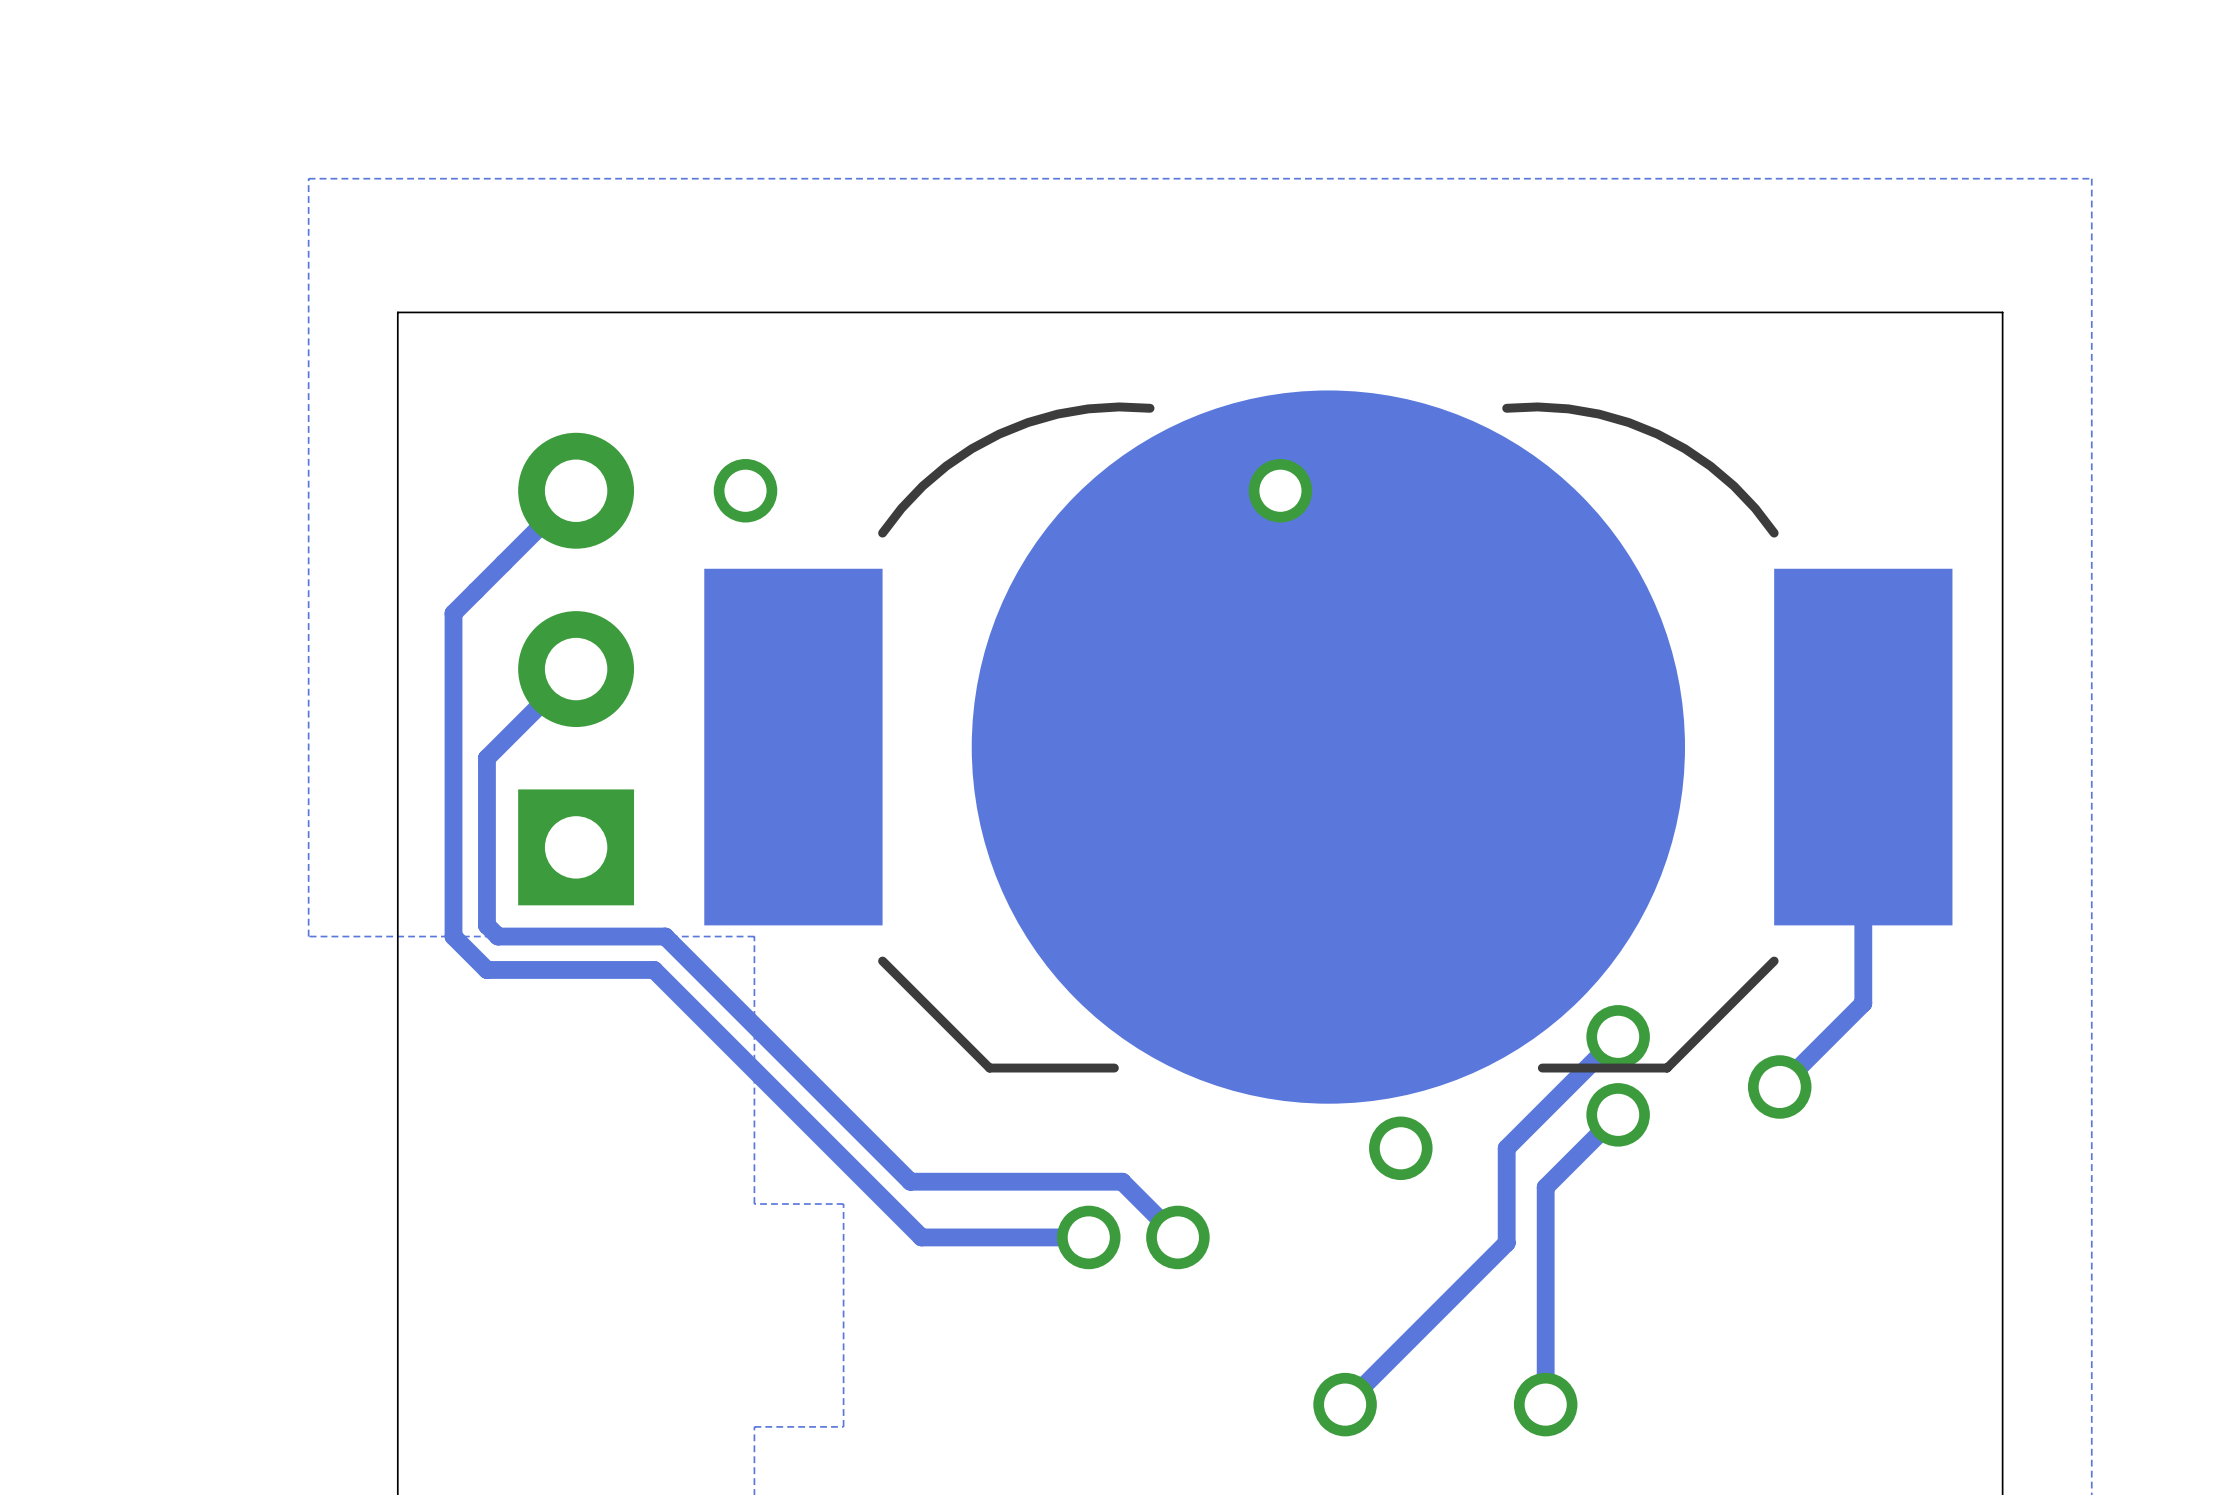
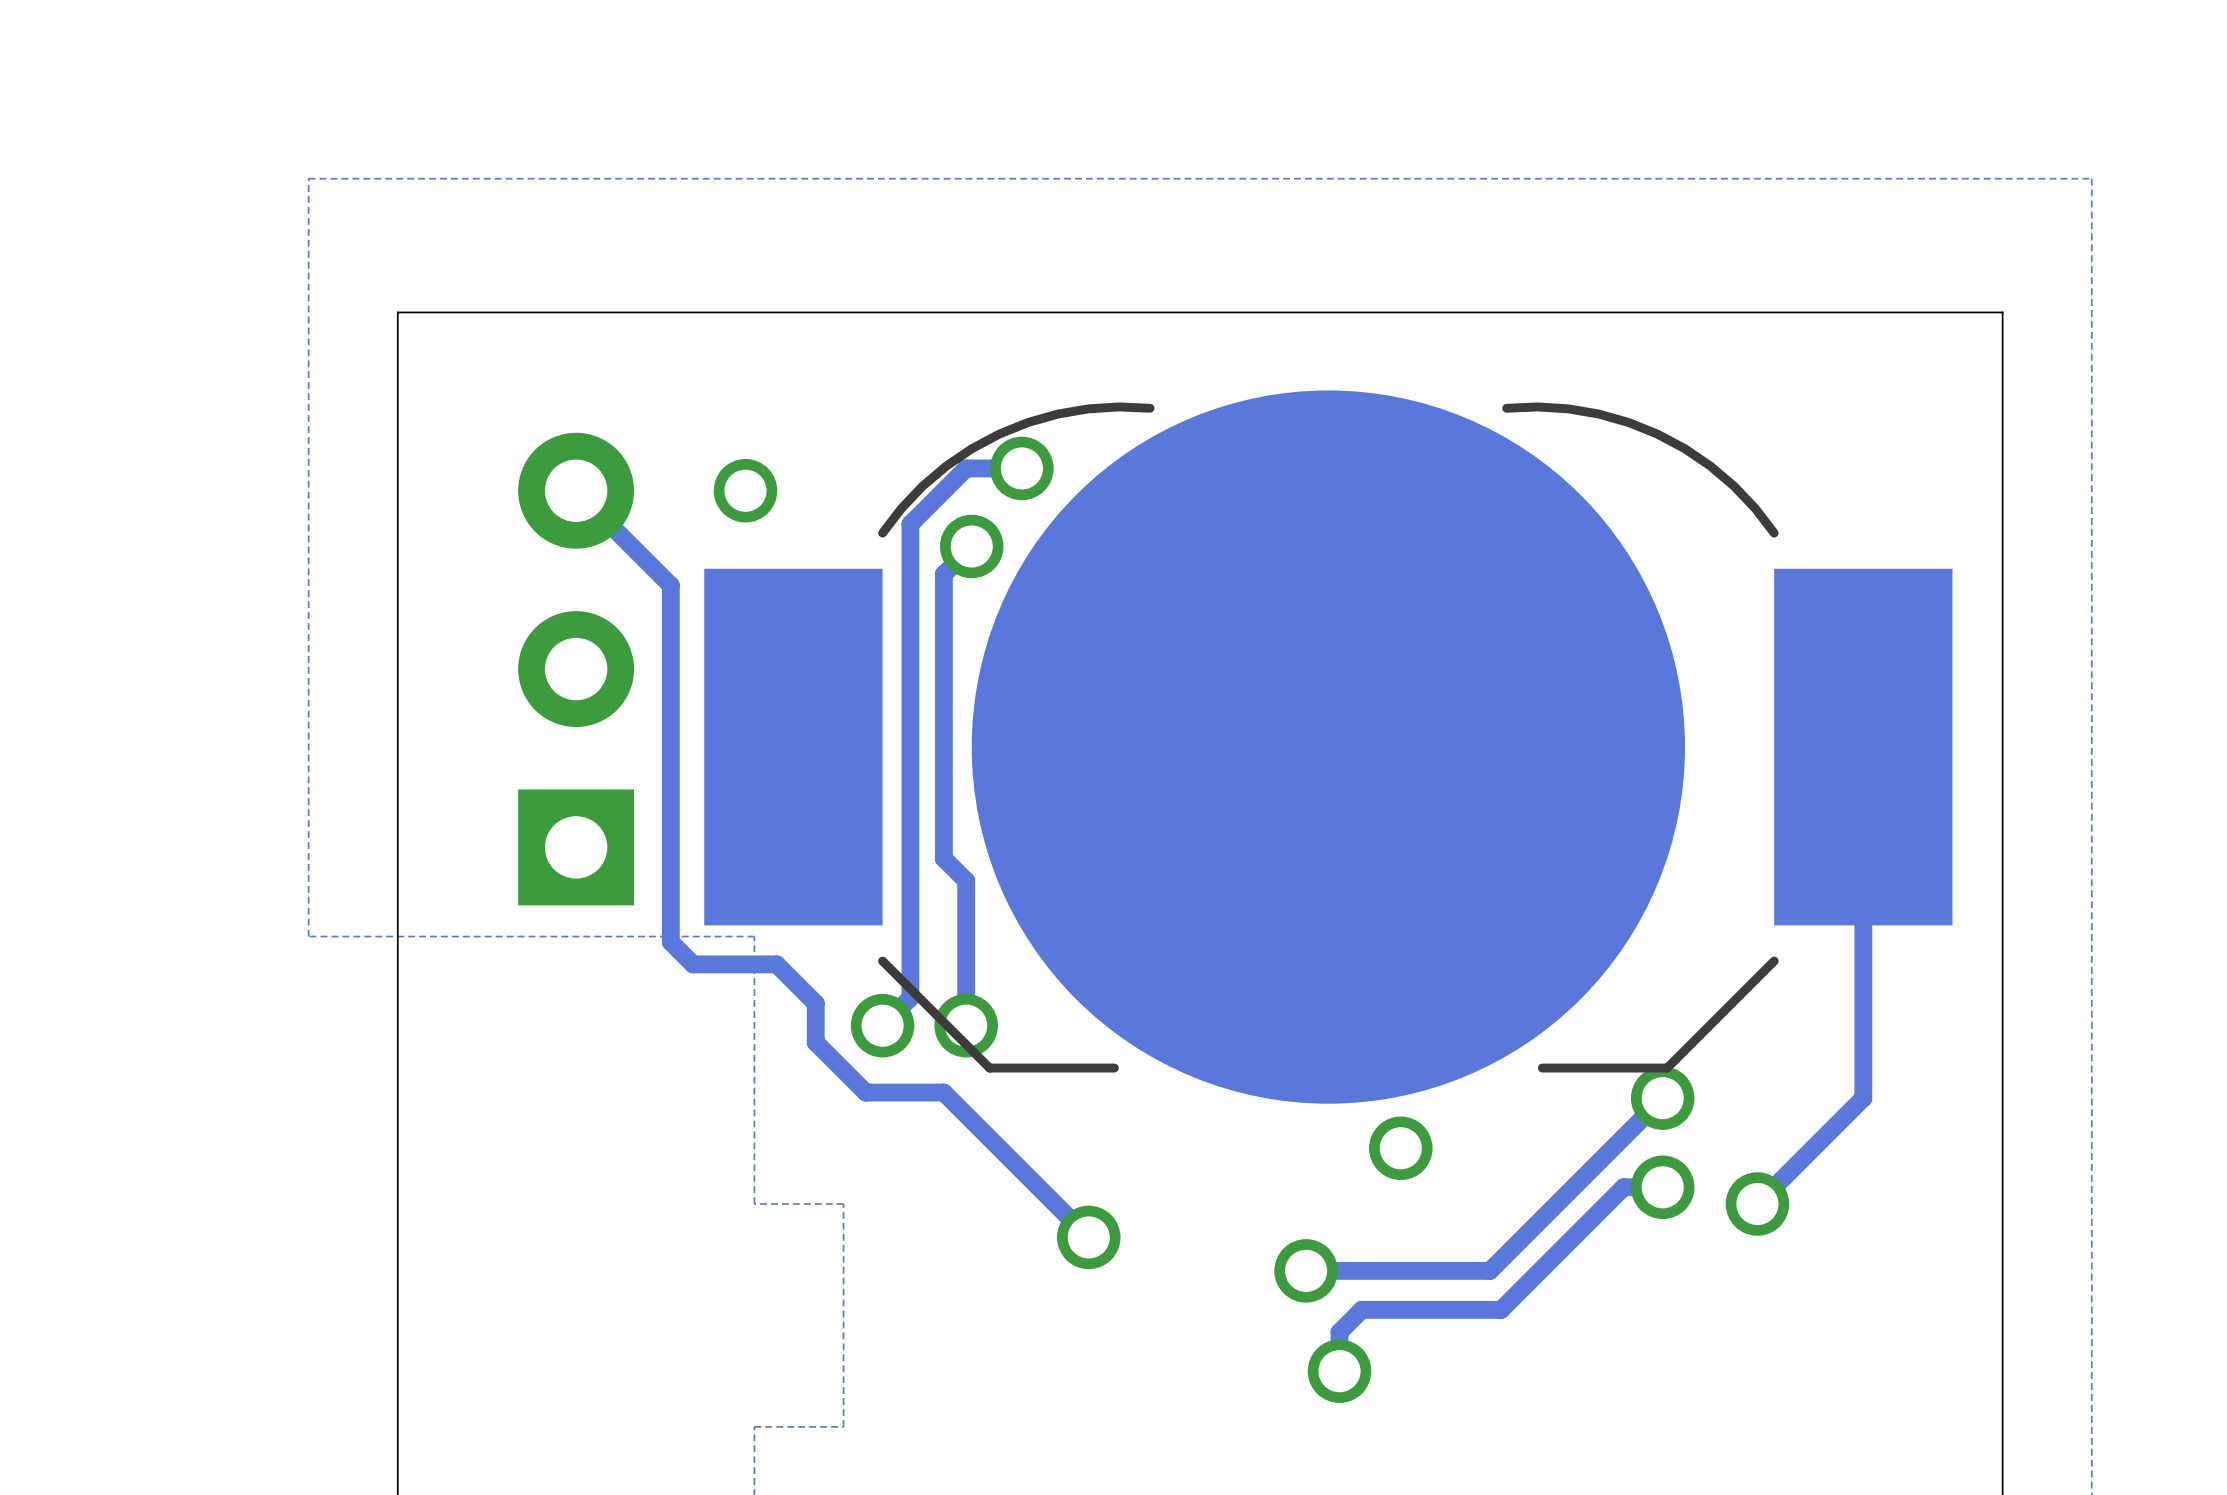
track: none -> (1021, 468) (966, 468) (910, 524) (910, 997) (882, 1025)
via: none -> (1021, 468)
track: (576, 490) (453, 613) (453, 936) (486, 969) (654, 969) (921, 1237) (1088, 1237) -> none
via: (1280, 490) -> none
track: none -> (971, 546) (943, 574) (943, 858) (966, 880) (966, 1025)
via: none -> (971, 546)
track: (576, 669) (486, 758) (486, 925) (498, 936) (665, 936) (670, 942) -> (576, 490) (670, 585) (670, 942)
track: (693, 964) (910, 1181) (1122, 1181) (1177, 1237) -> (693, 964) (776, 964) (815, 1003) (815, 1042) (865, 1092) (943, 1092) (1088, 1237)
track: (1863, 1003) (1779, 1086) -> (1863, 1003) (1863, 1098) (1757, 1204)
via: none -> (882, 1025)
via: none -> (966, 1025)
track: (1618, 1036) (1506, 1148) (1506, 1243) (1345, 1404) -> none
via: (1618, 1036) -> none
via: (1779, 1086) -> none
track: none -> (1662, 1098) (1489, 1270) (1306, 1270)
via: none -> (1662, 1098)
track: (1618, 1114) (1545, 1187) (1545, 1404) -> none
via: (1618, 1114) -> none
track: none -> (1662, 1187) (1623, 1187) (1501, 1309) (1361, 1309) (1339, 1332) (1339, 1371)
via: none -> (1662, 1187)
via: none -> (1757, 1204)
via: (1177, 1237) -> none
via: none -> (1306, 1270)
via position: (1345, 1404) -> (1339, 1371)
via: (1545, 1404) -> none

